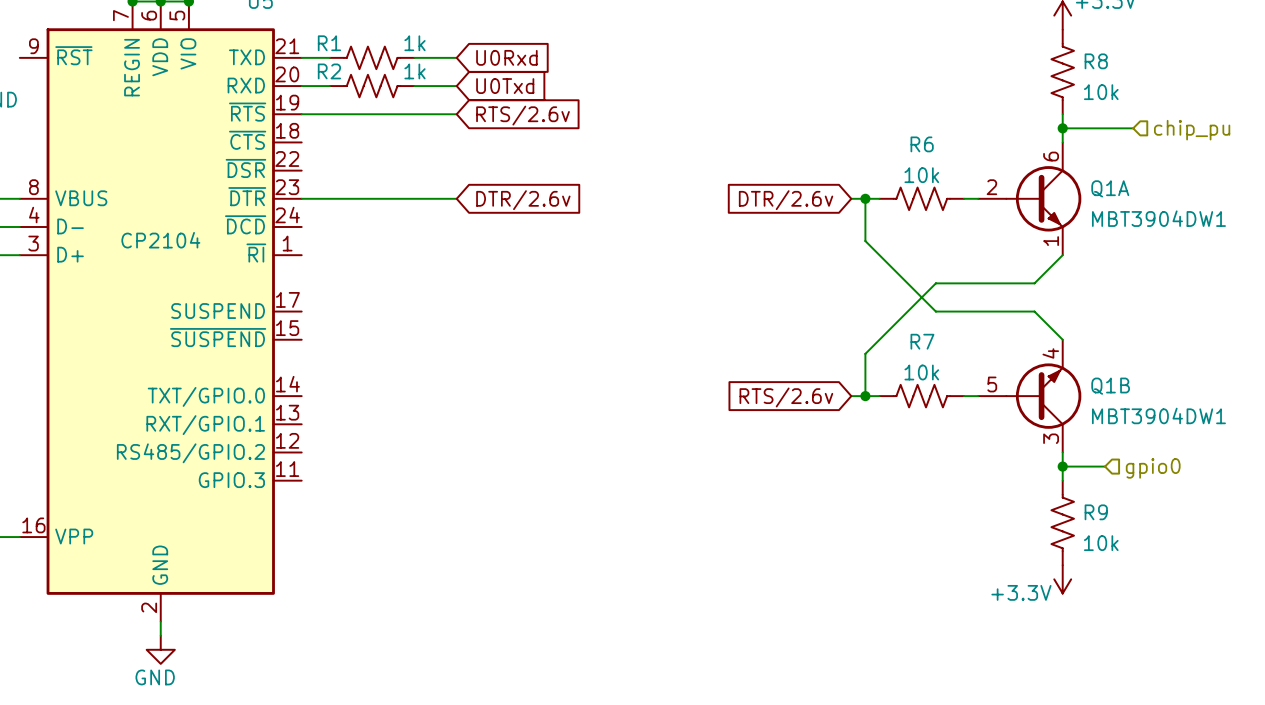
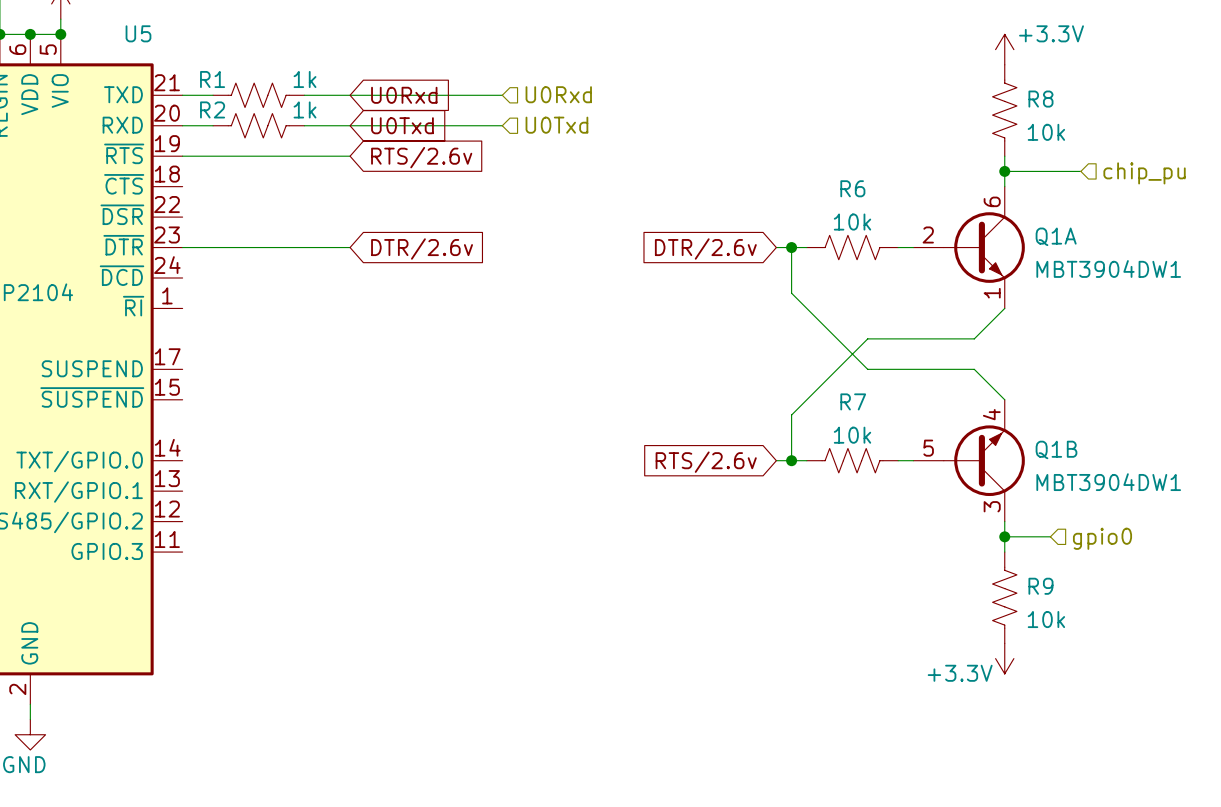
wire: none -> (350, 95) (502, 95)
hierarchical label: none -> U0Rxd (558, 94)
hierarchical label: none -> U0Txd (556, 125)
wire: none -> (350, 125) (502, 125)

